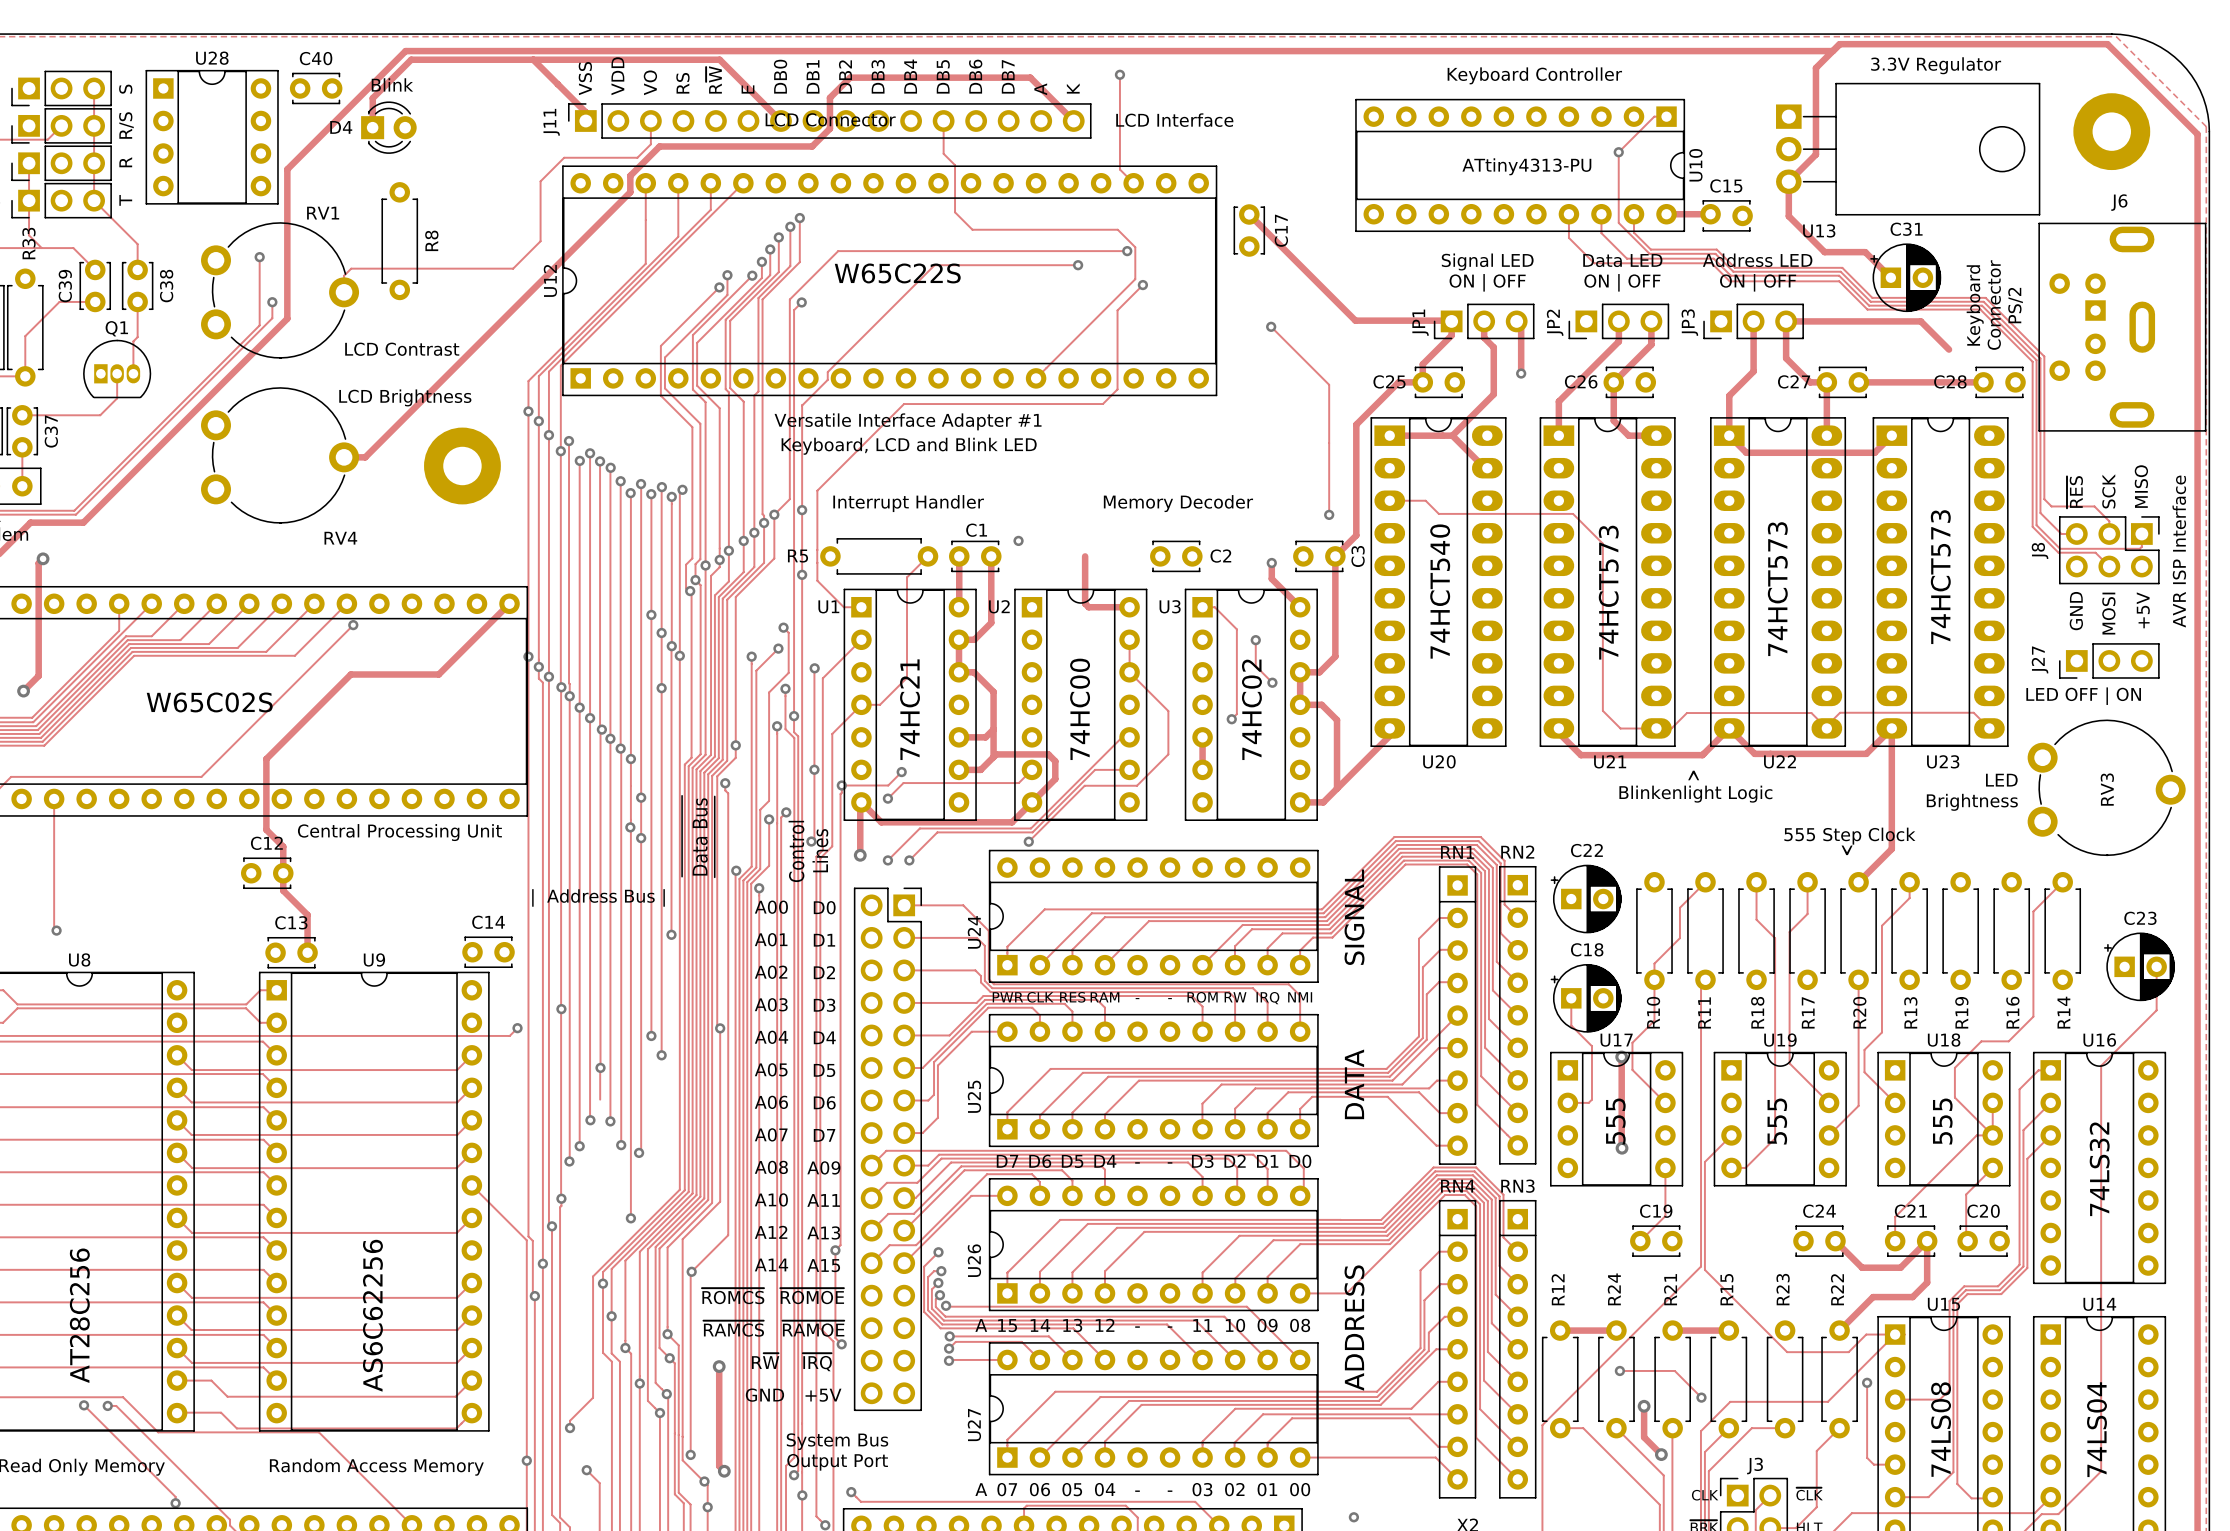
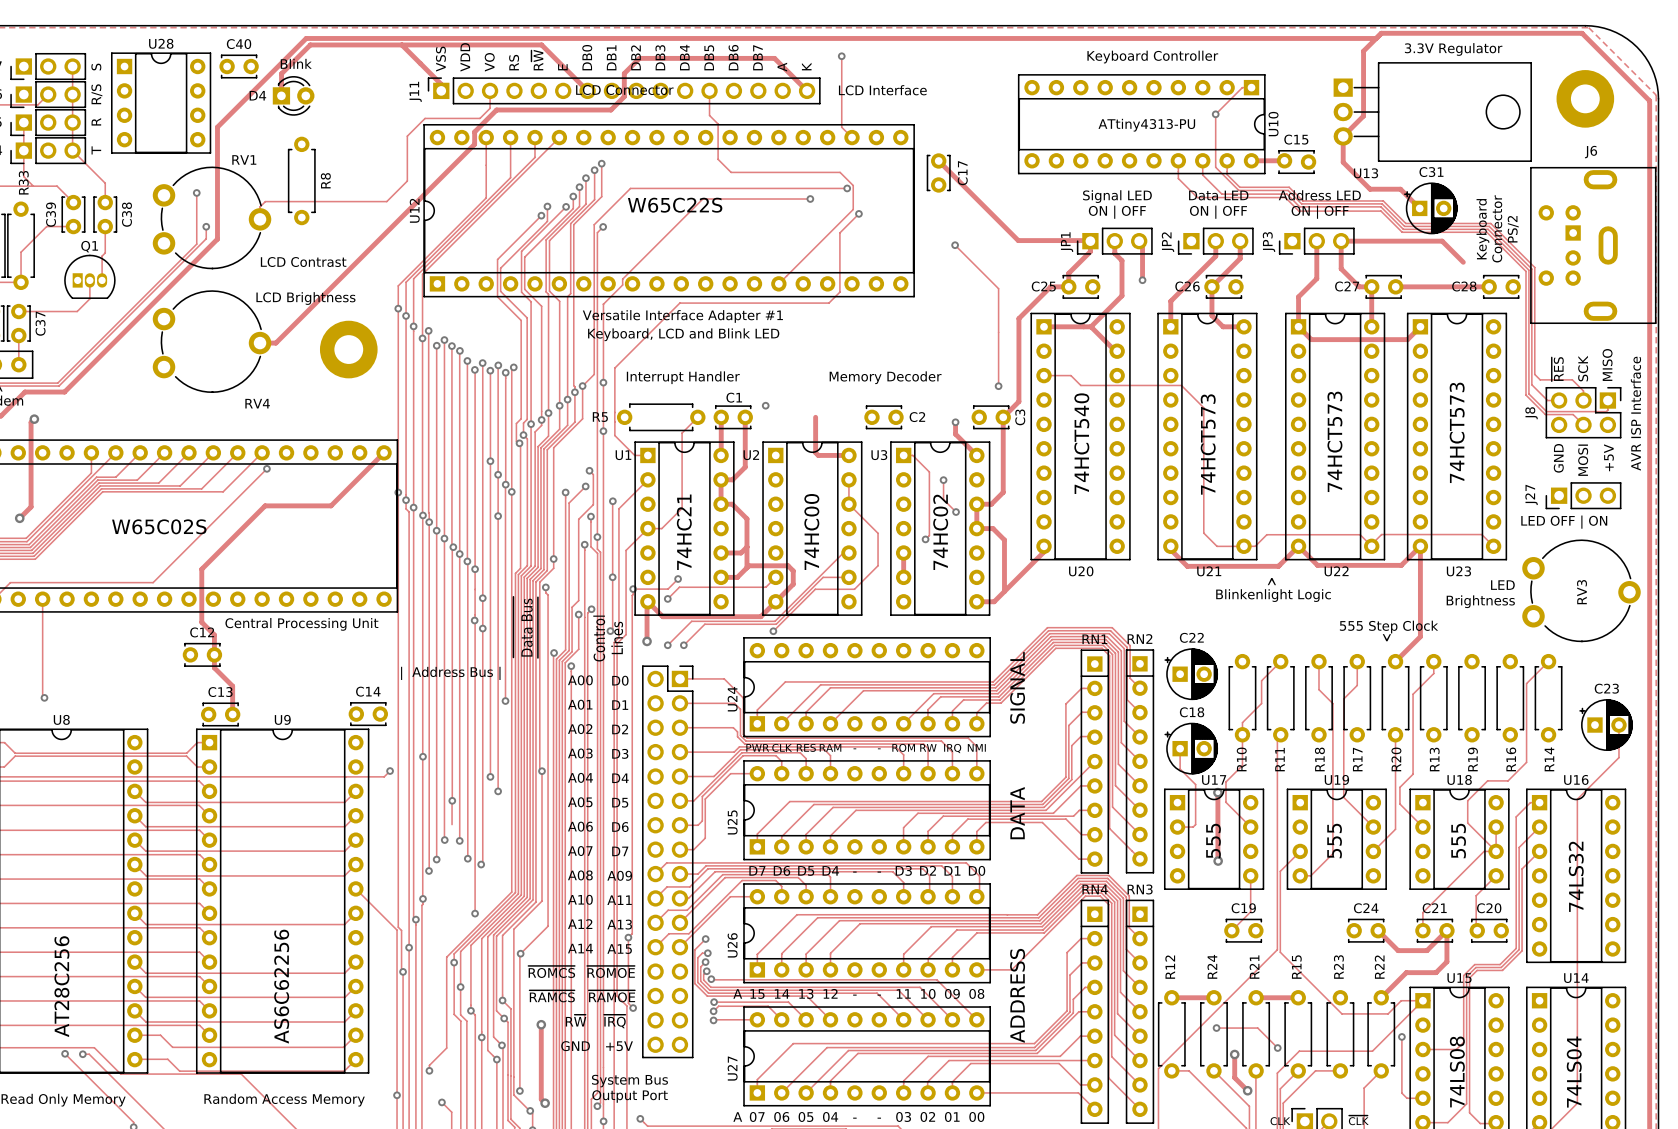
U20 footprint: [1370, 417, 1507, 747] -> [1030, 312, 1131, 561]
U21 footprint: [1539, 417, 1676, 747] -> [1157, 312, 1258, 561]
U22 footprint: [1710, 417, 1847, 747] -> [1285, 312, 1386, 561]
U23 footprint: [1872, 417, 2009, 747] -> [1407, 312, 1507, 561]
J3 name: J3 (1755, 1466) -> none

